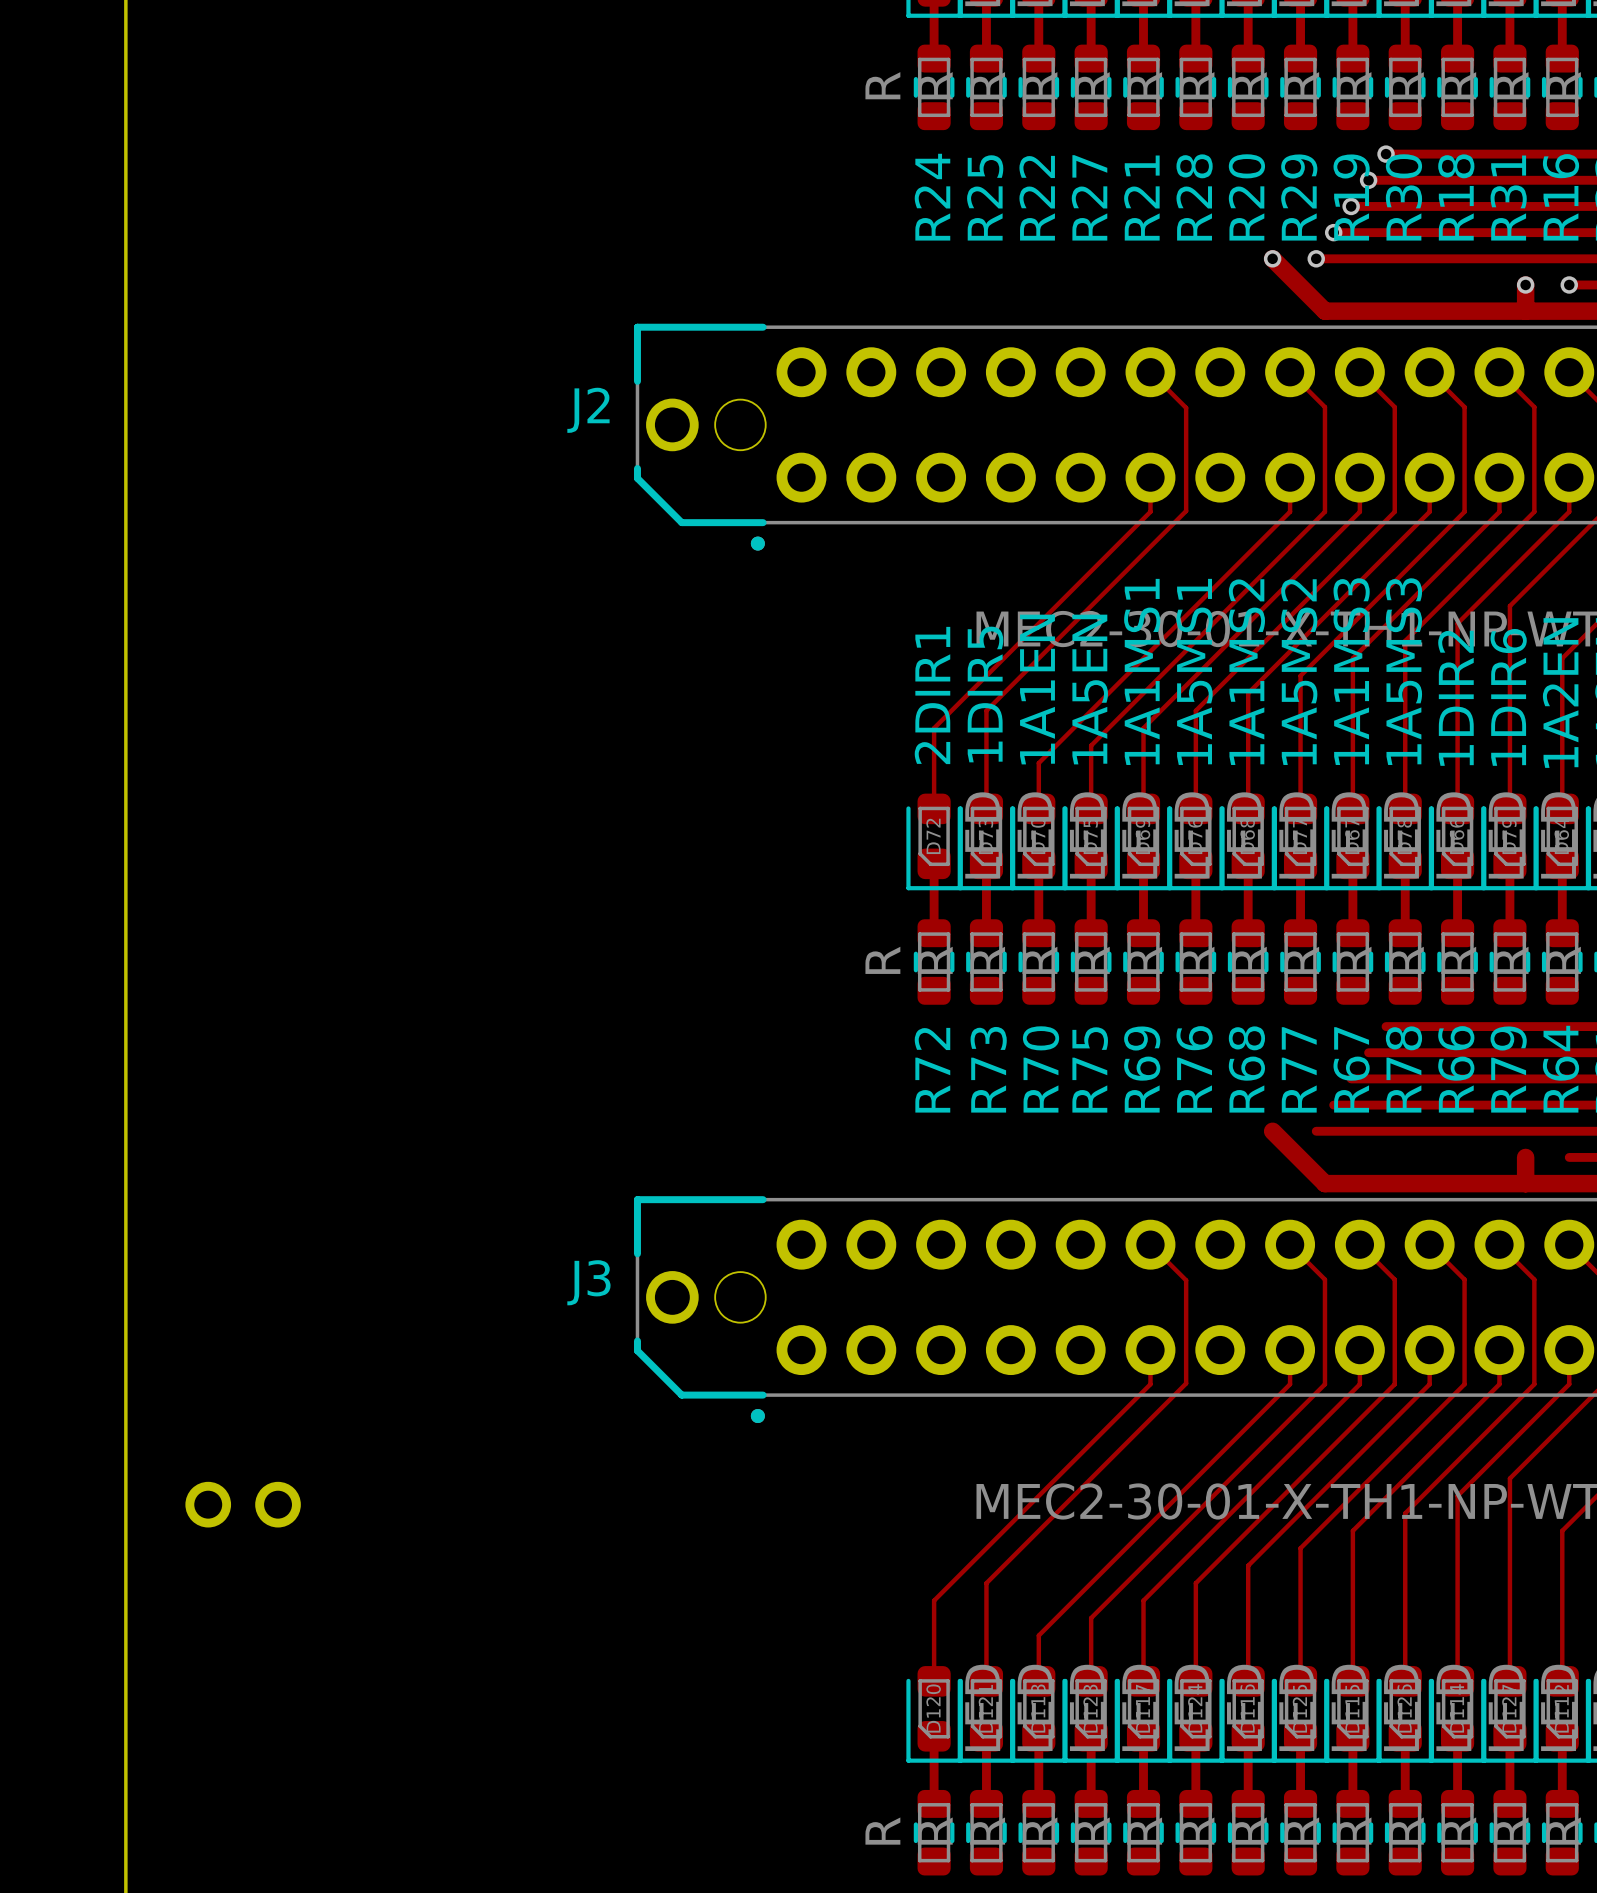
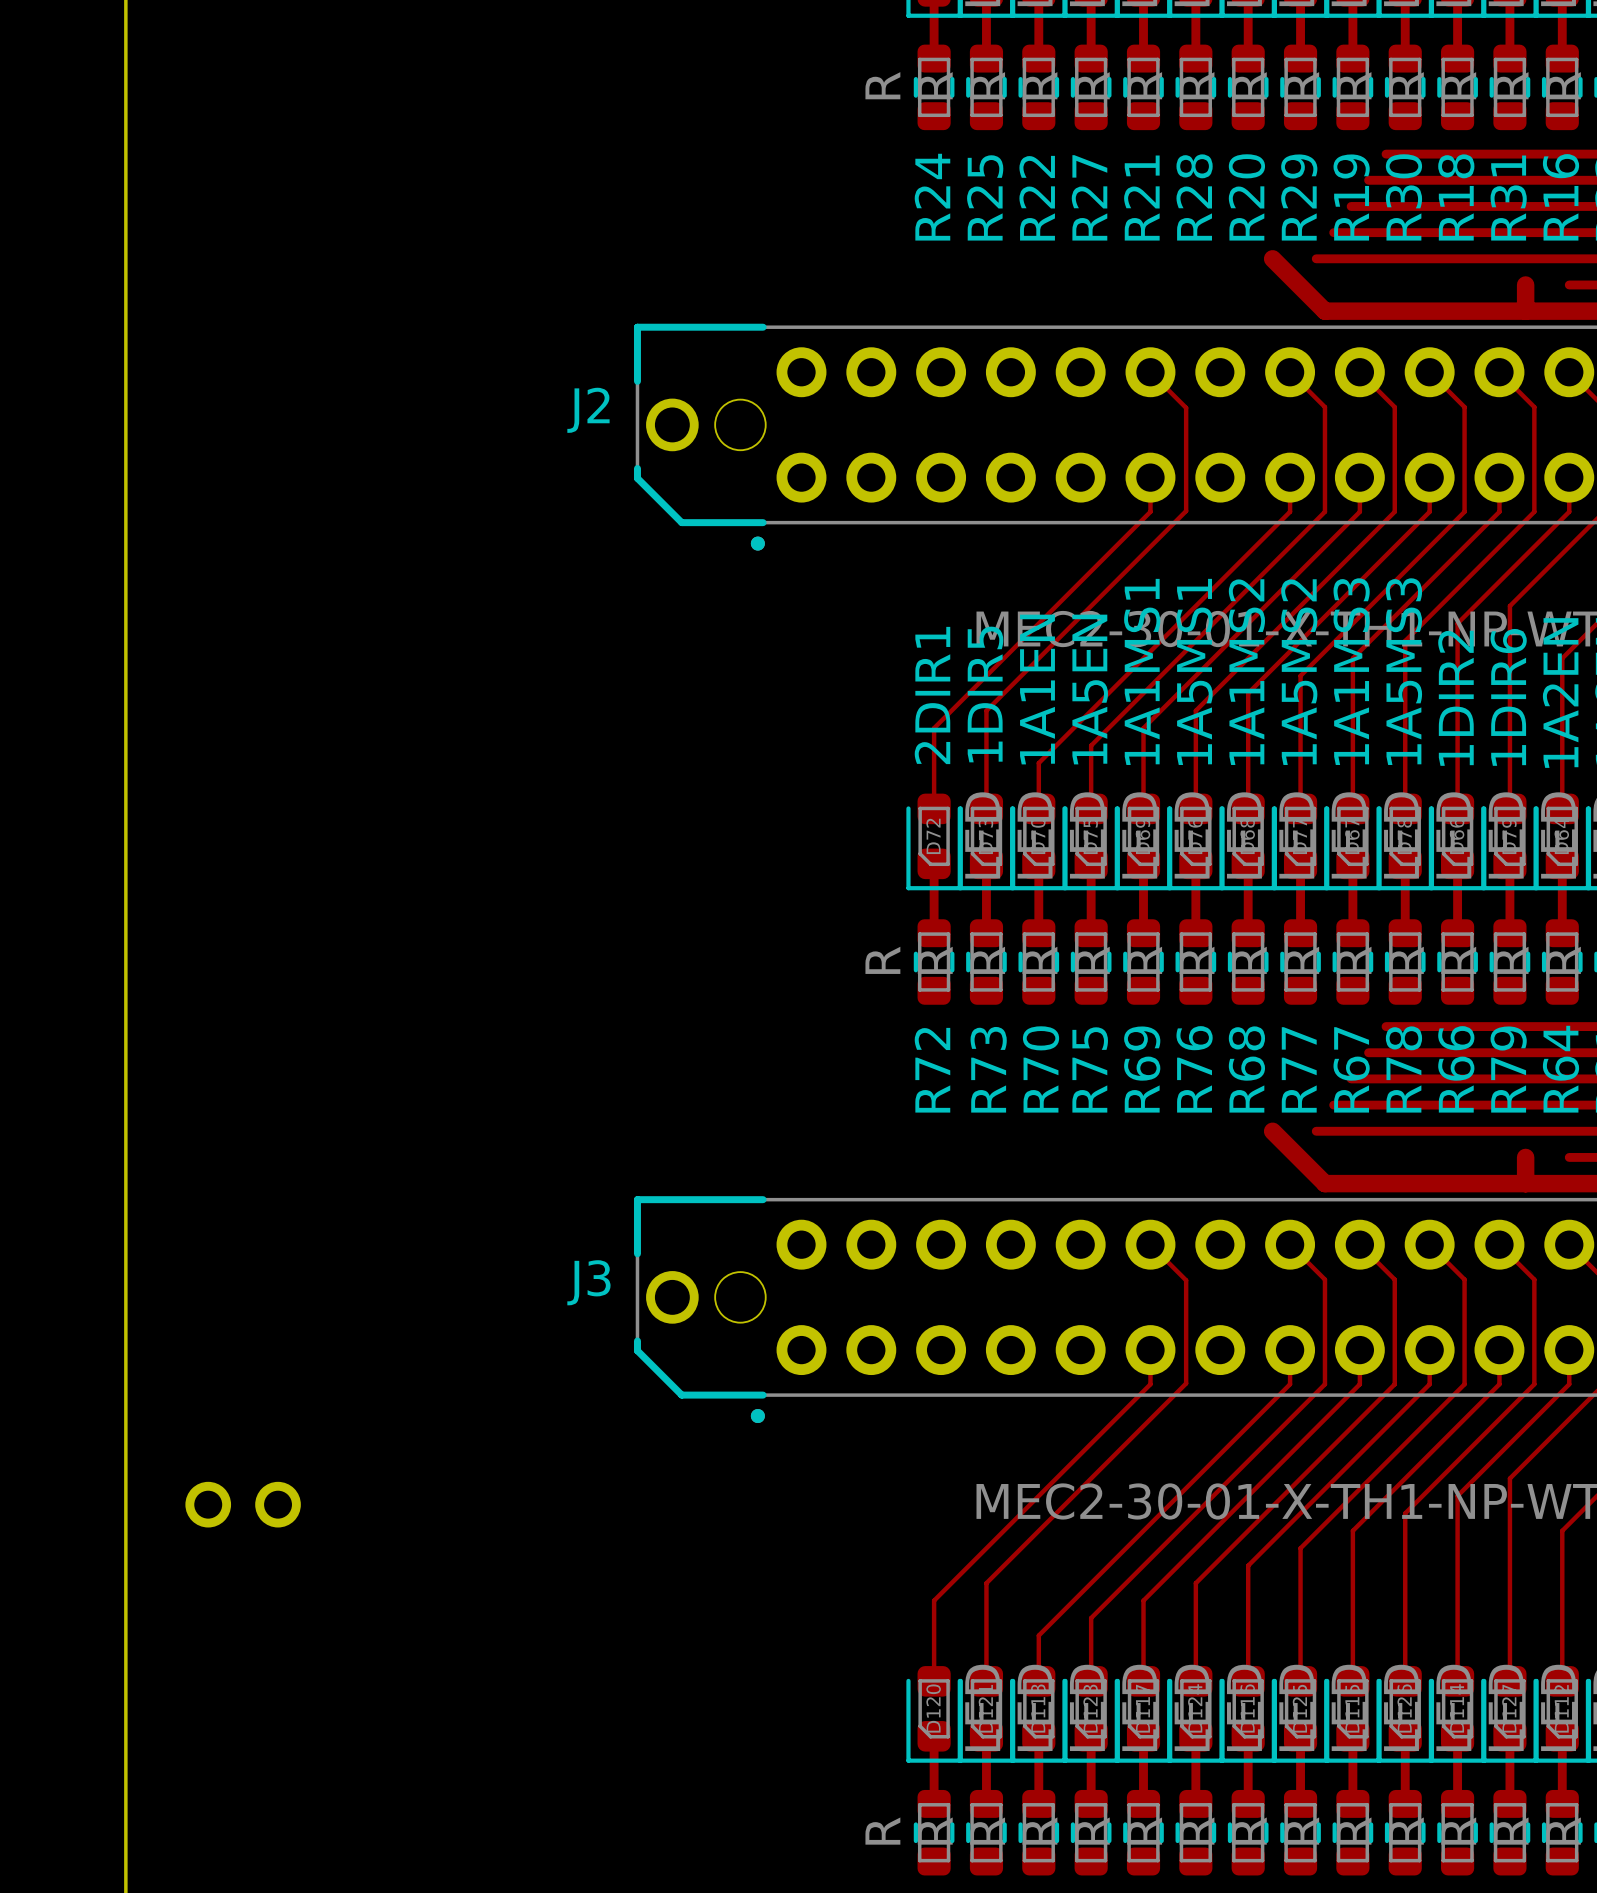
via: (1386, 154) -> none
via: (1368, 180) -> none
via: (1351, 206) -> none
via: (1333, 232) -> none
via: (1272, 258) -> none
via: (1316, 258) -> none
via: (1525, 284) -> none
via: (1569, 284) -> none

